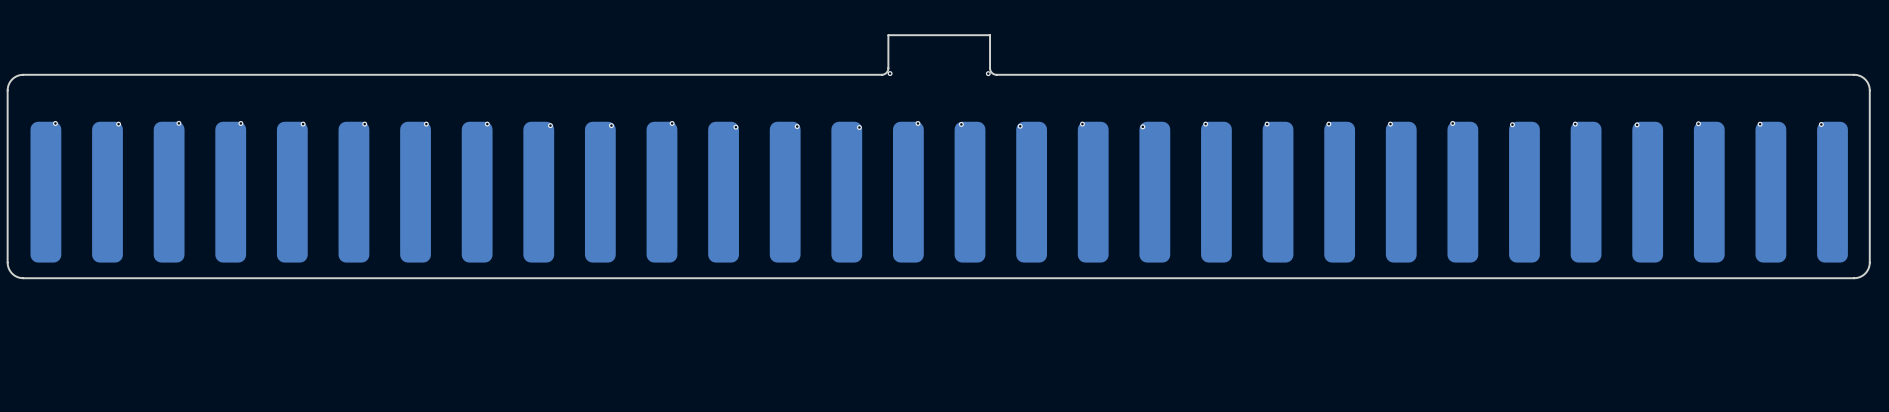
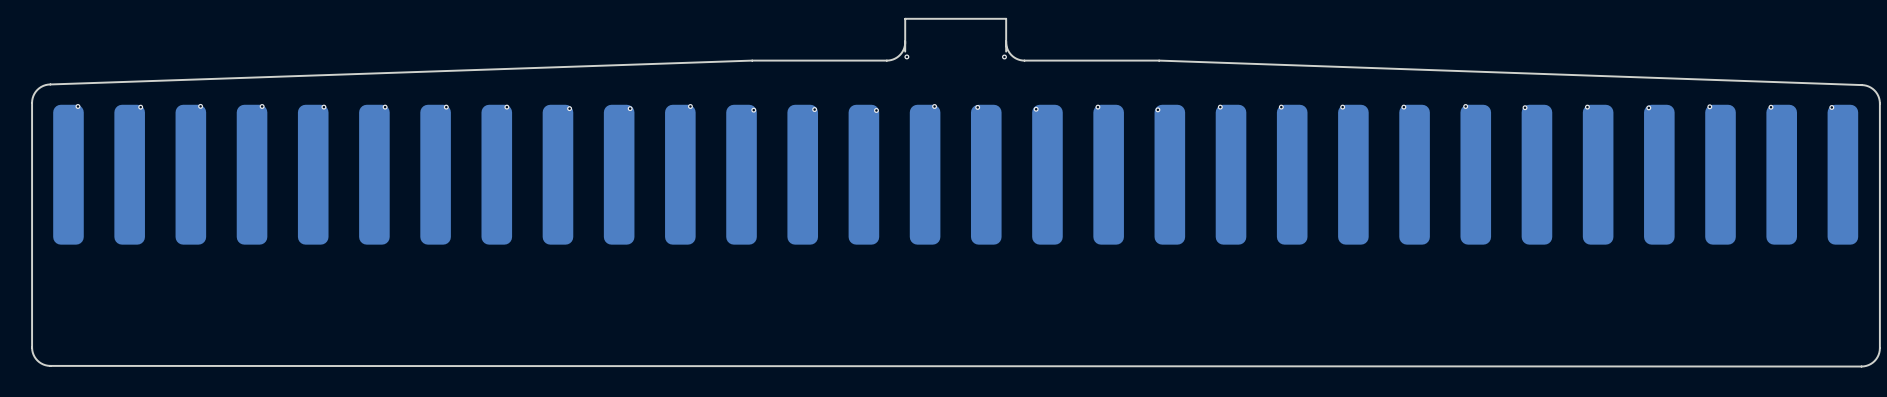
board edge: (888, 68) (886, 72) (881, 74) (19, 75) (10, 80) (7, 90) (8, 266) (13, 274) (23, 278) (1854, 278) (1865, 273) (1869, 262) -> (905, 41) (900, 54) (886, 60) (752, 60) (43, 85) (35, 91) (32, 102) (33, 354) (39, 362) (50, 365) (1861, 366) (1874, 361) (1879, 350) (1879, 244)
board edge: (990, 68) (991, 72) (996, 74) (1854, 74) (1863, 78) (1868, 84) (1869, 120) -> (1006, 41) (1011, 54) (1022, 60) (1159, 60) (1861, 85) (1874, 90) (1879, 103)

